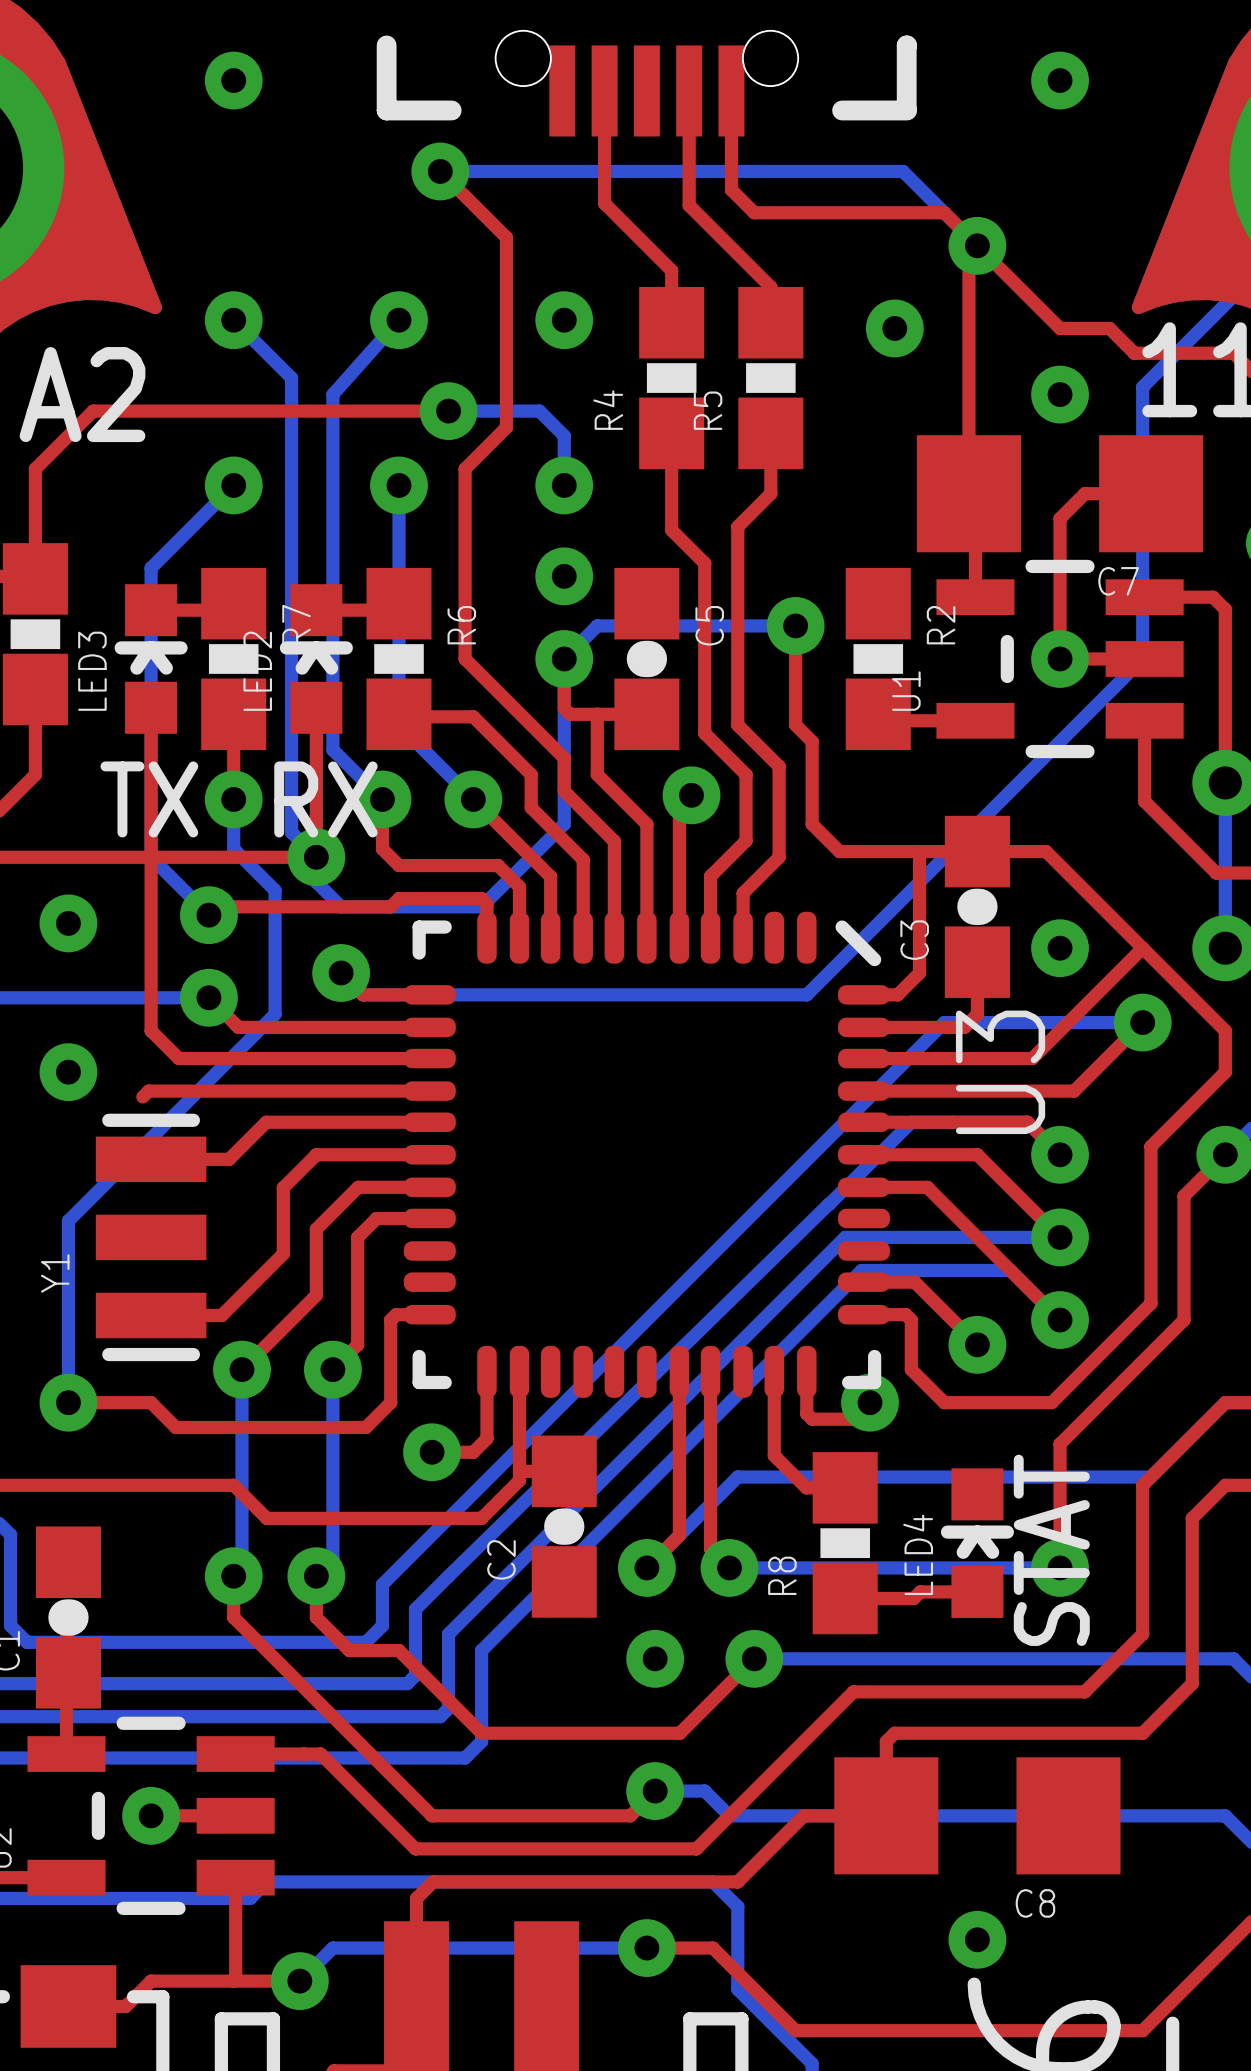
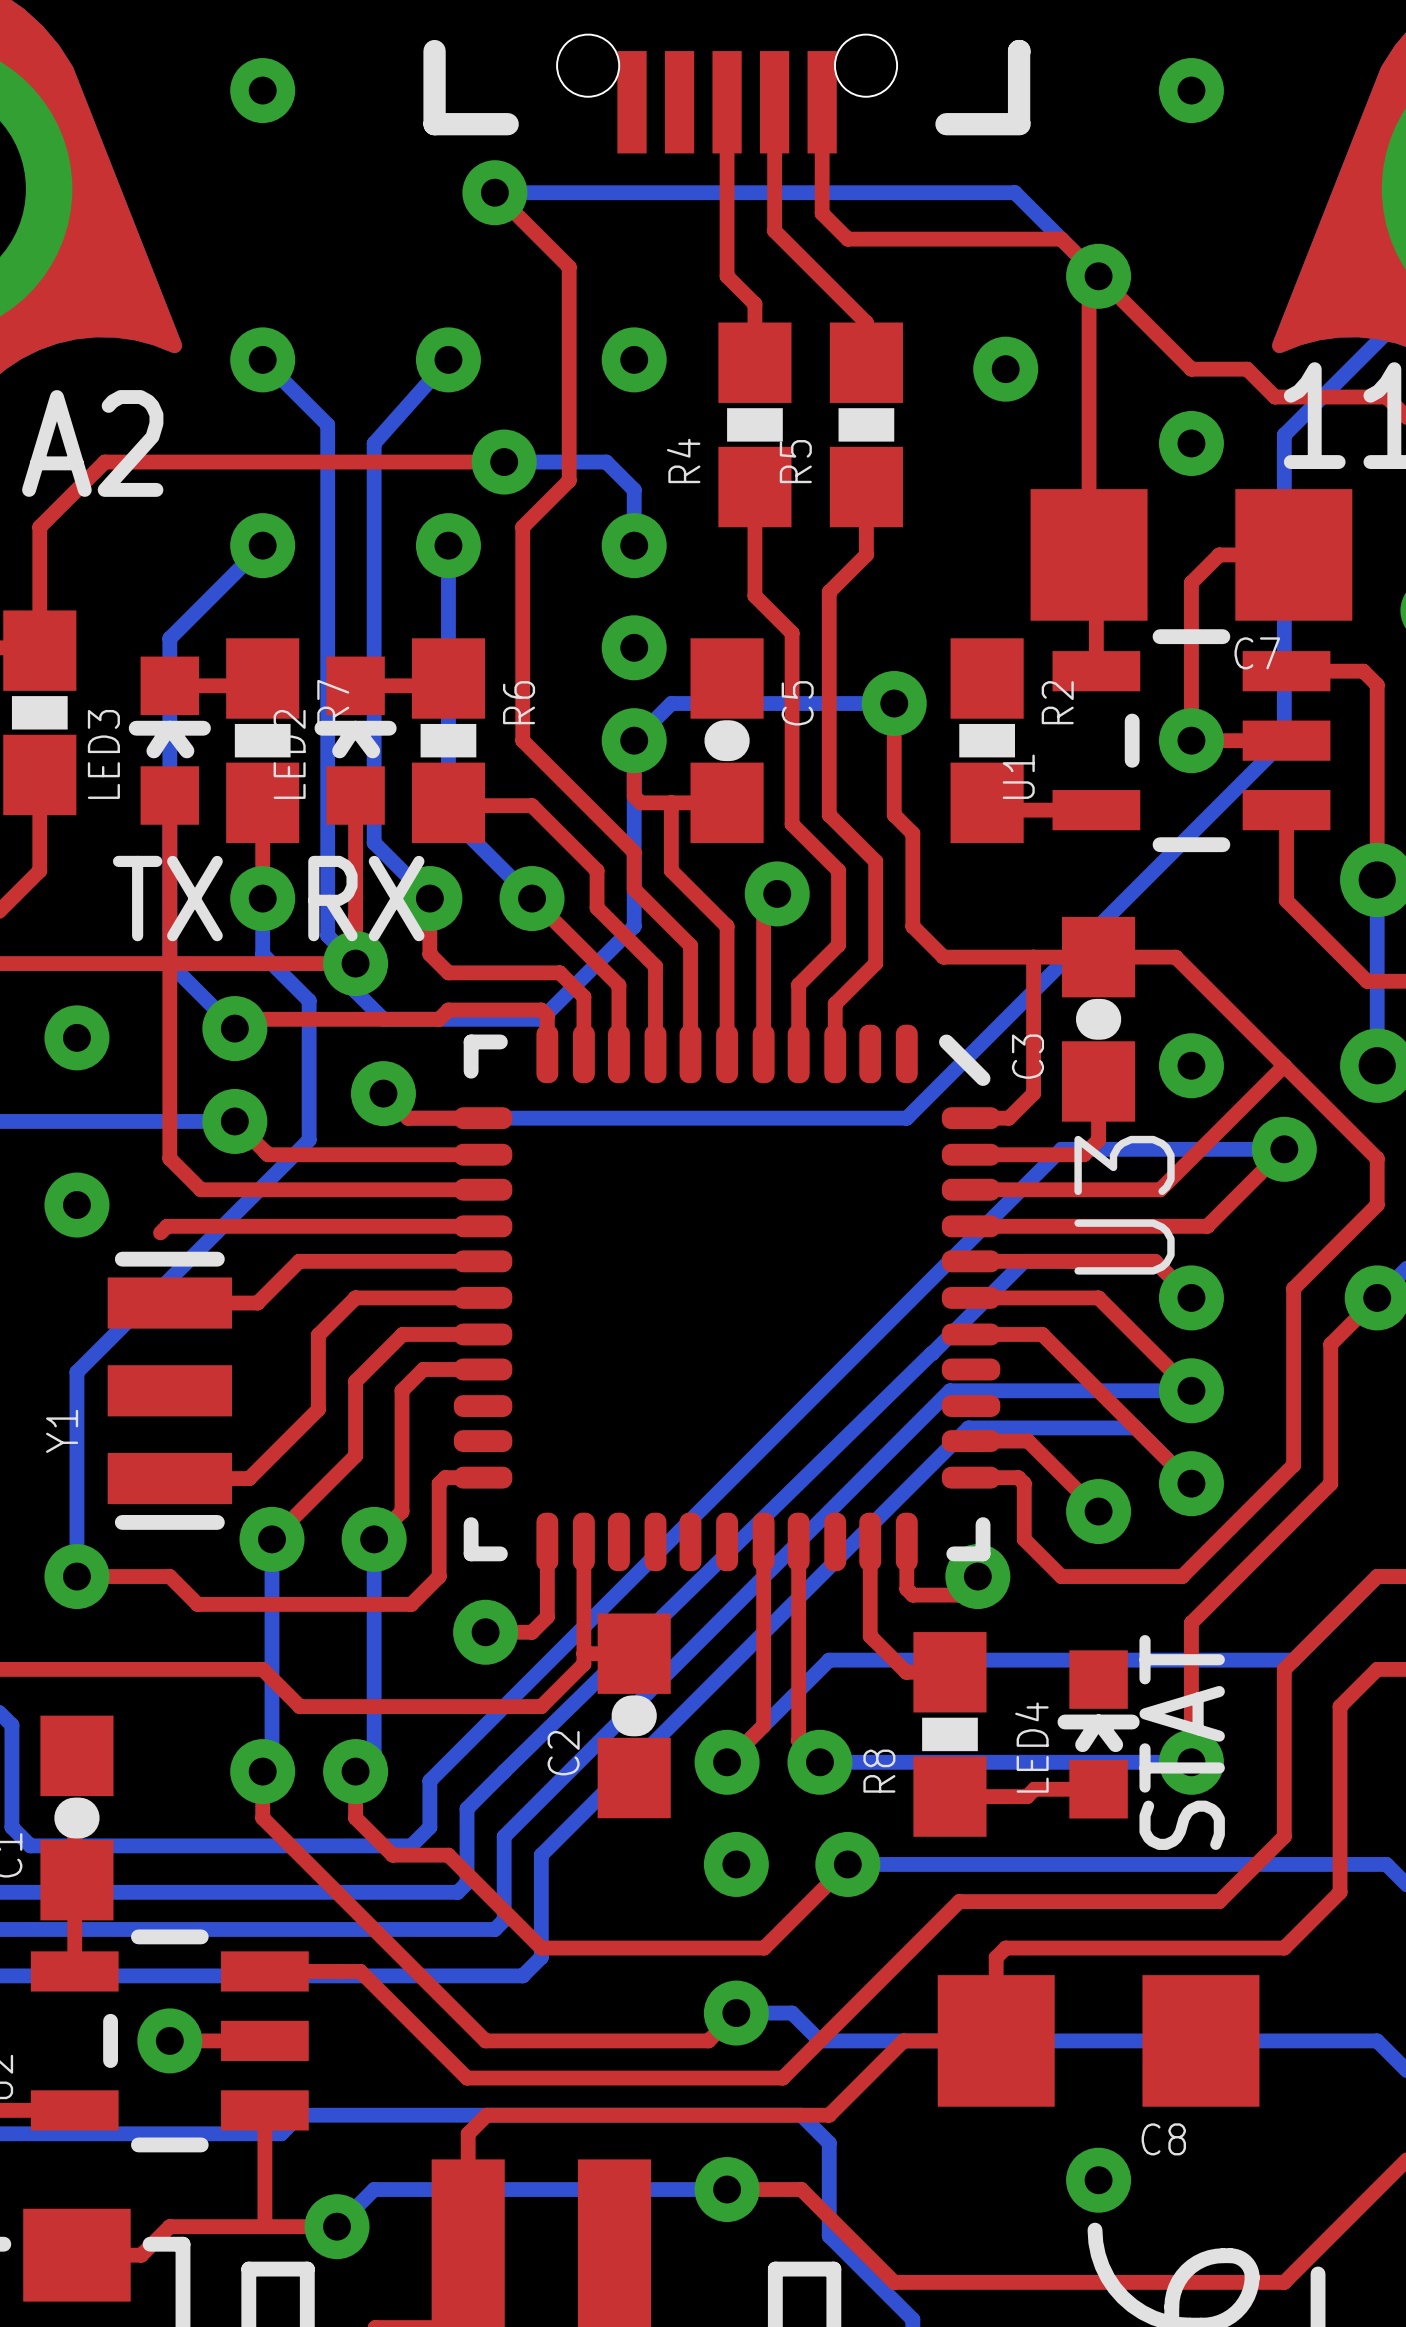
top track: (604, 90) (604, 203) (646, 245) -> (727, 102) (727, 276)

